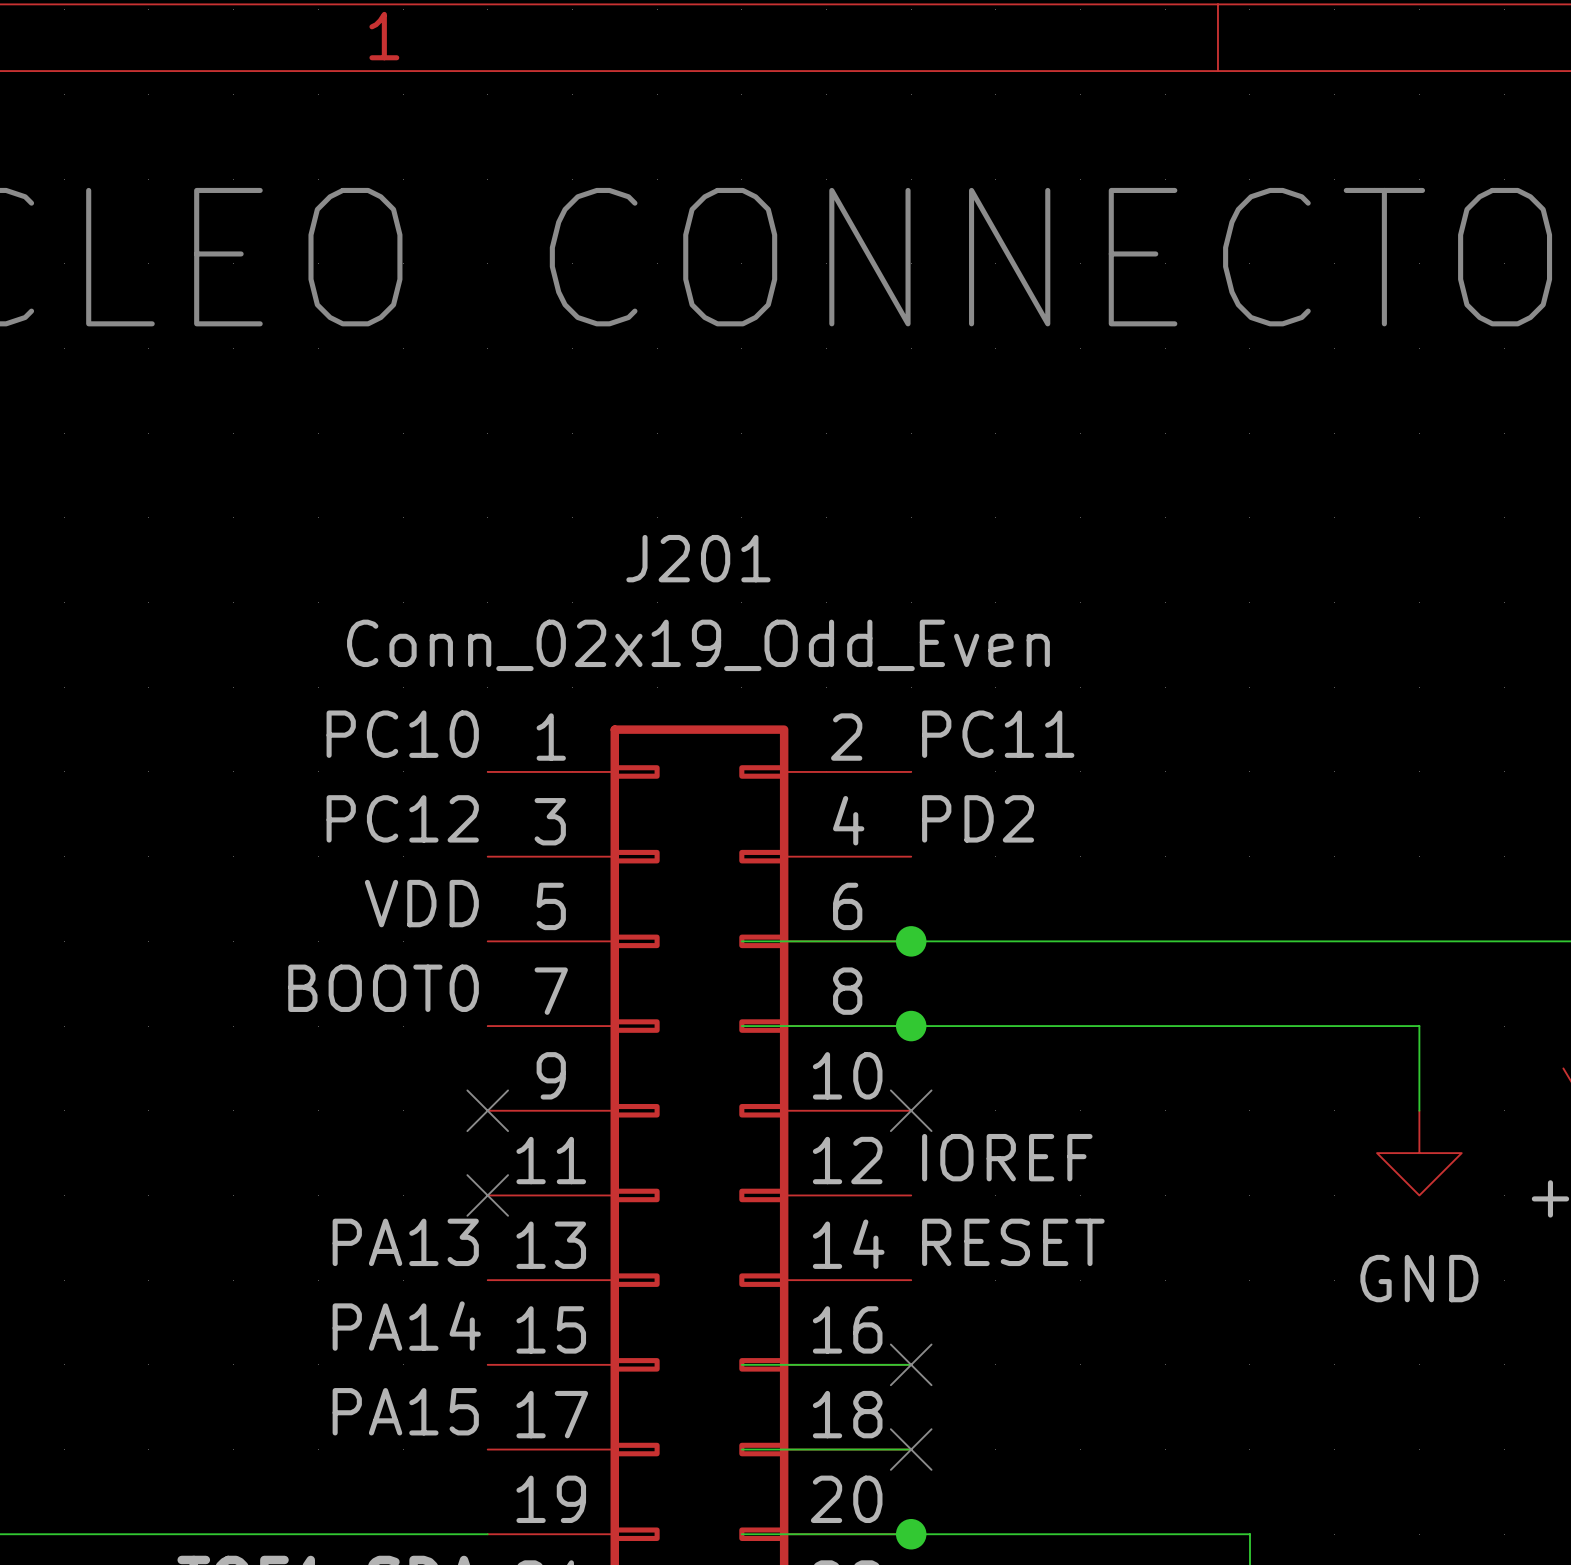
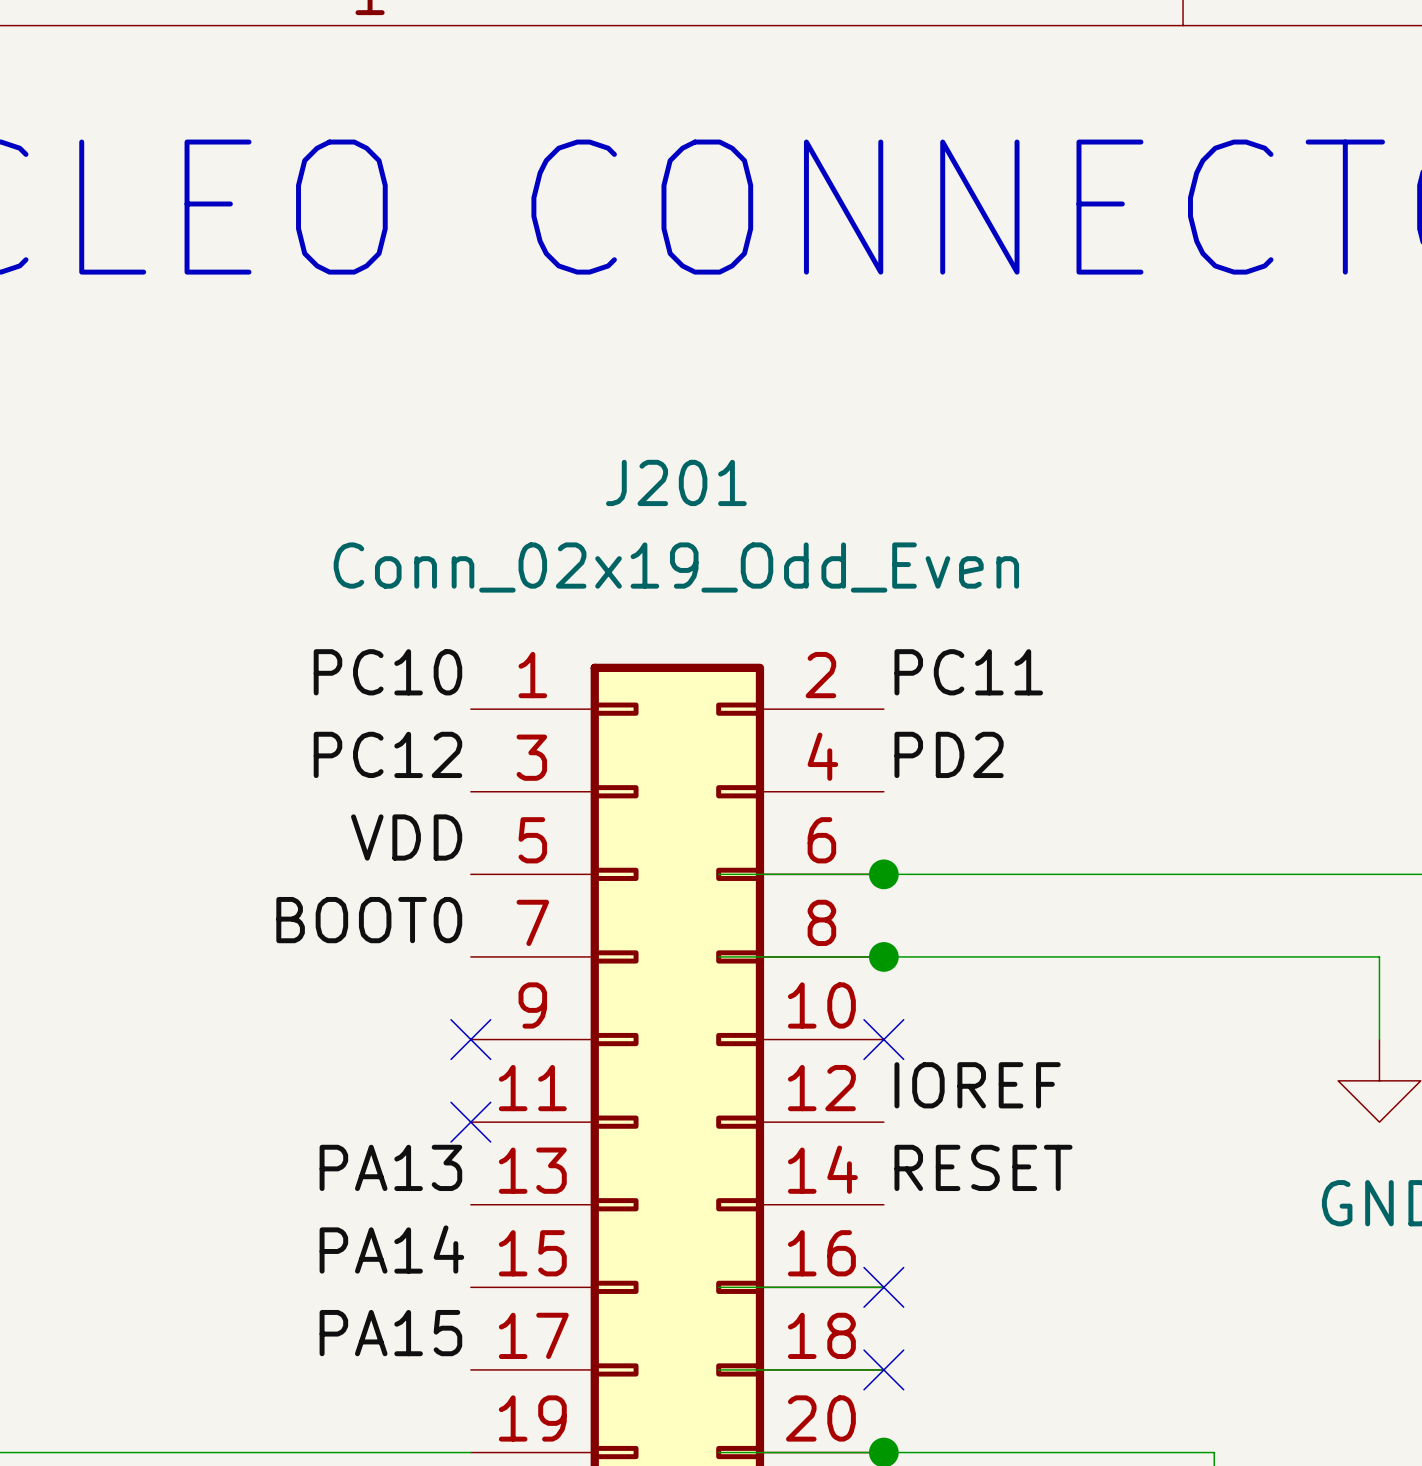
J201 name position: J201 (698, 558) -> J201 (676, 482)
J201 value position: Conn_02x19_Odd_Even (698, 645) -> Conn_02x19_Odd_Even (676, 567)

